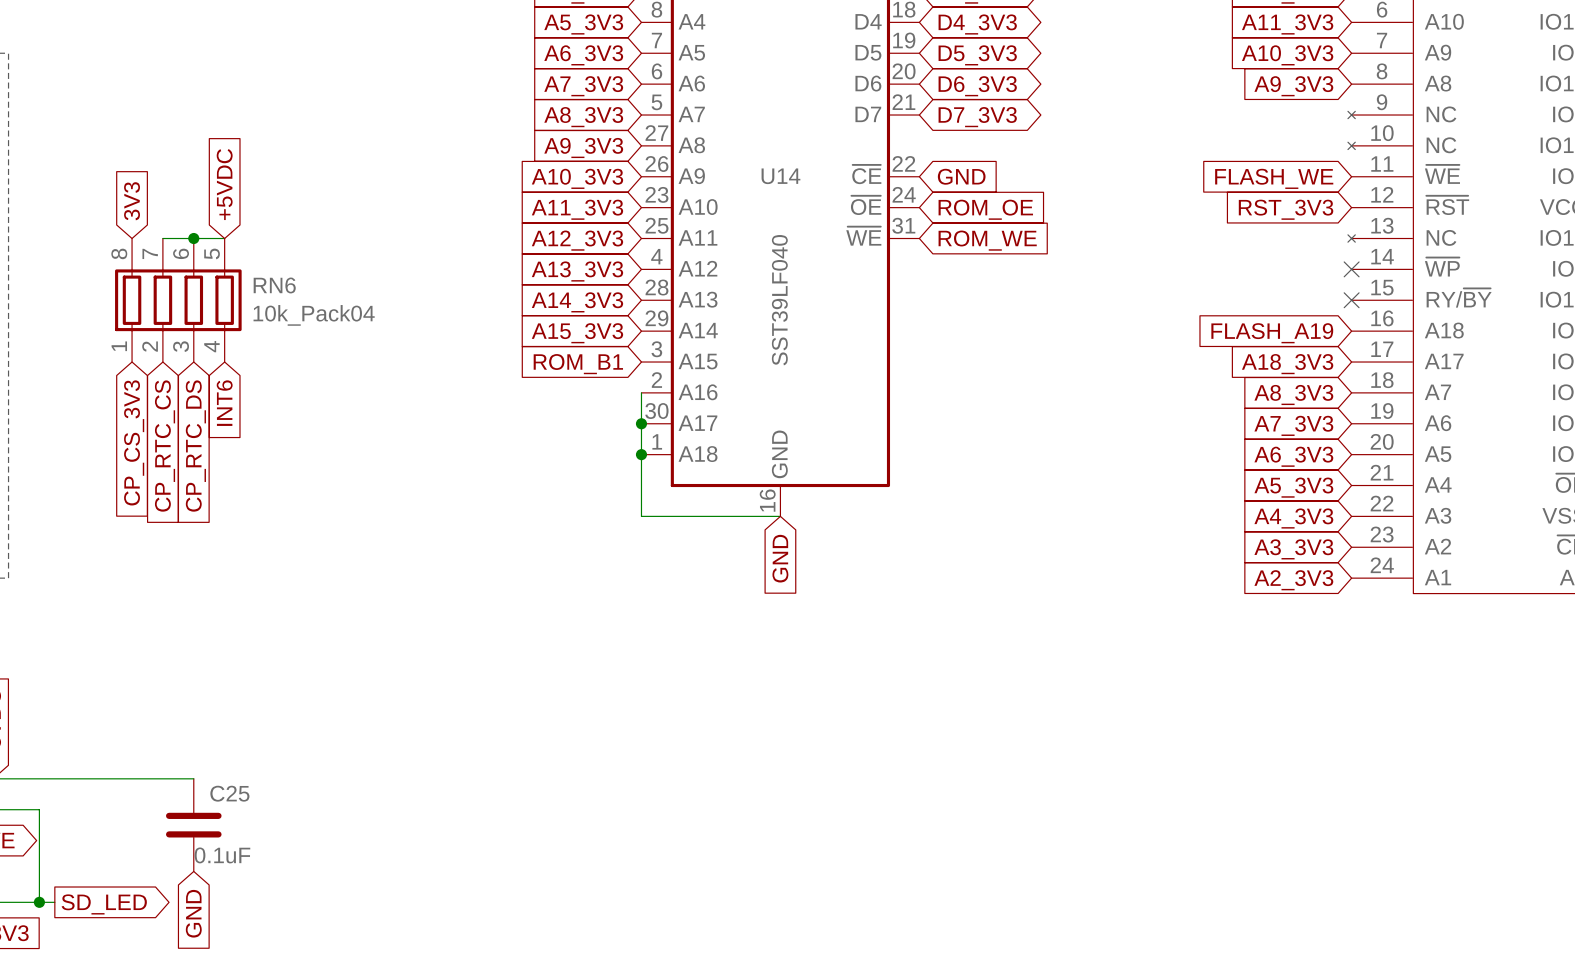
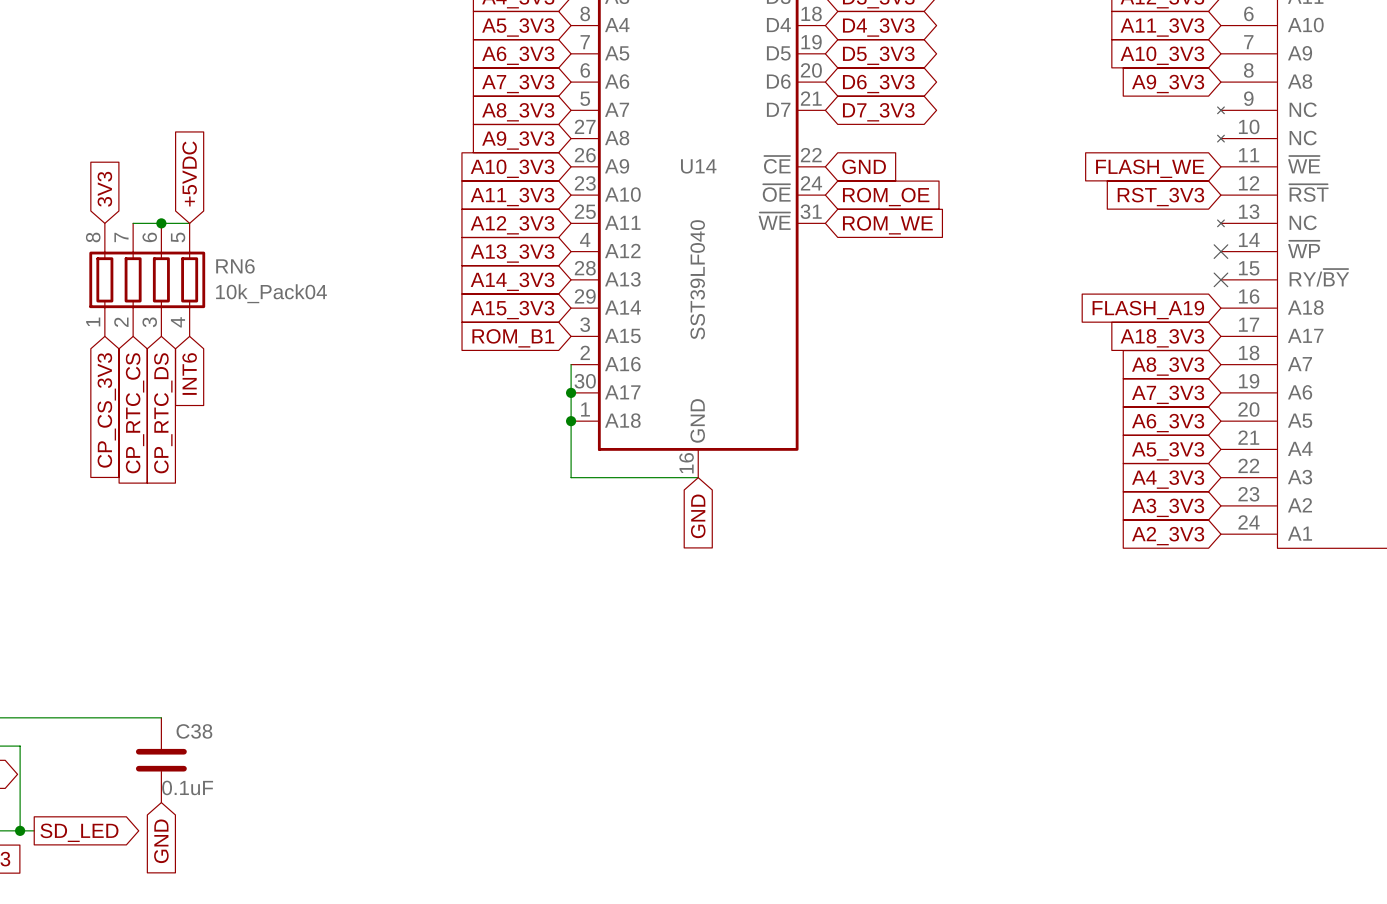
C25 name: C25 (229, 793) -> C38 (194, 731)

